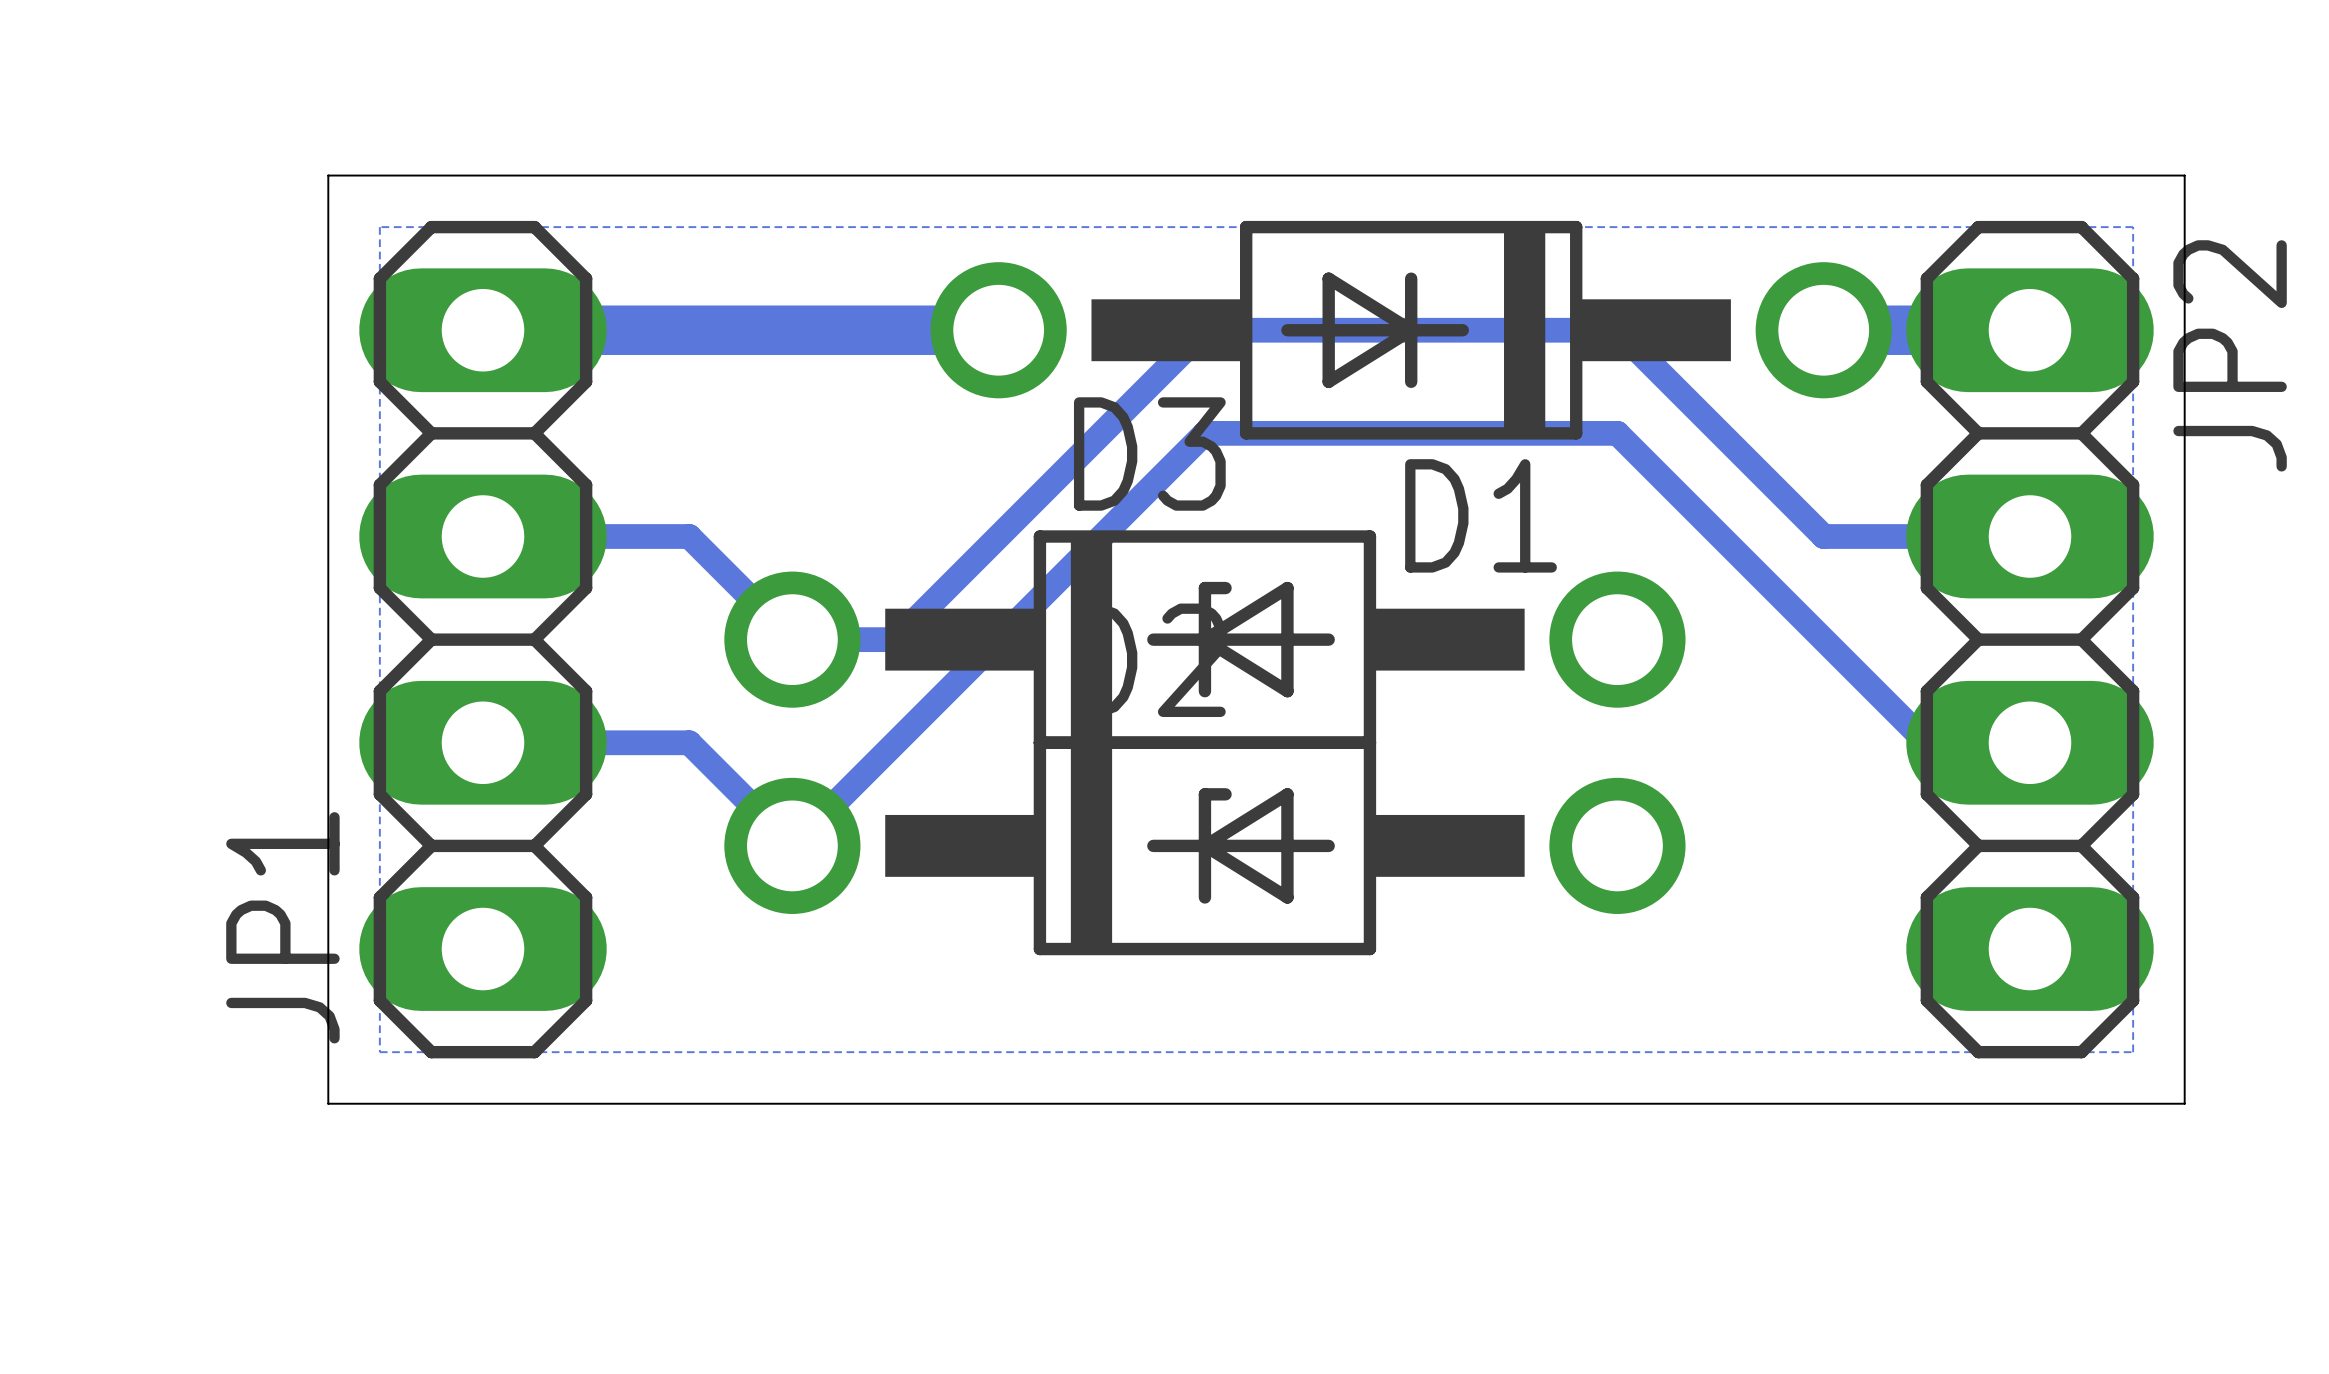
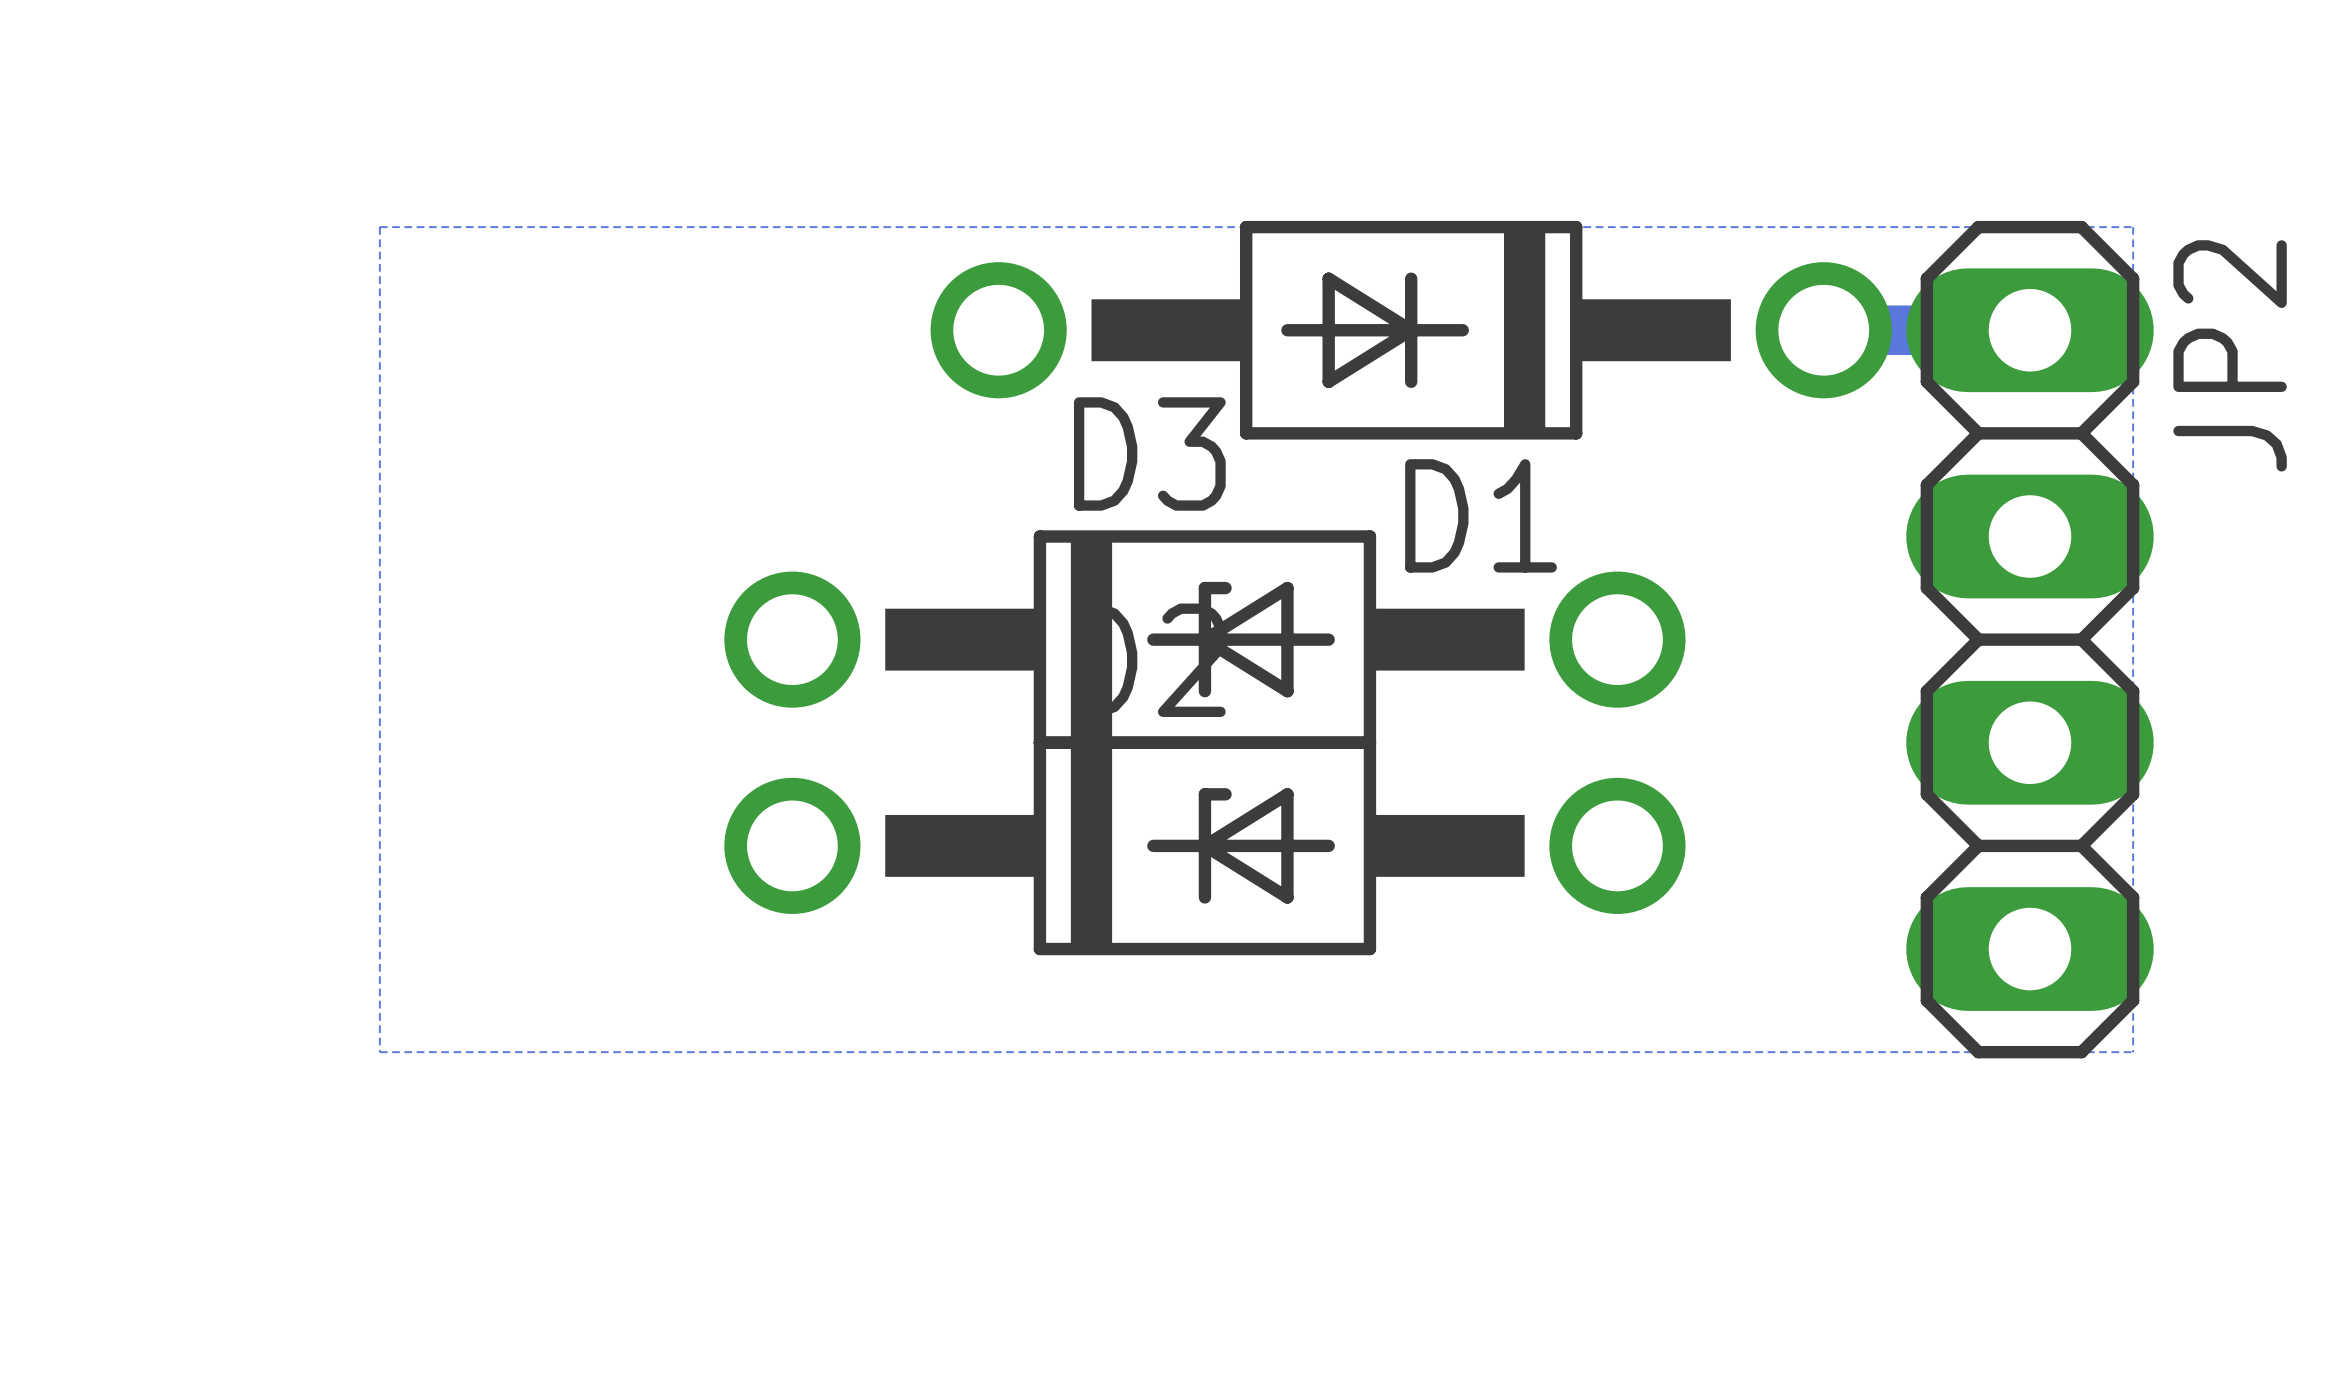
board edge: (328, 175) (2184, 175) (2184, 1103) (328, 1103) (328, 175) -> none
bottom track: (483, 330) (998, 330) -> none
bottom track: (483, 536) (689, 536) (792, 639) (895, 639) (1204, 330) (1617, 330) (1823, 536) (2029, 536) -> none
JP1: (483, 639) -> none
bottom track: (483, 742) (689, 742) (792, 845) (1204, 433) (1617, 433) (1926, 742) (2029, 742) -> none

